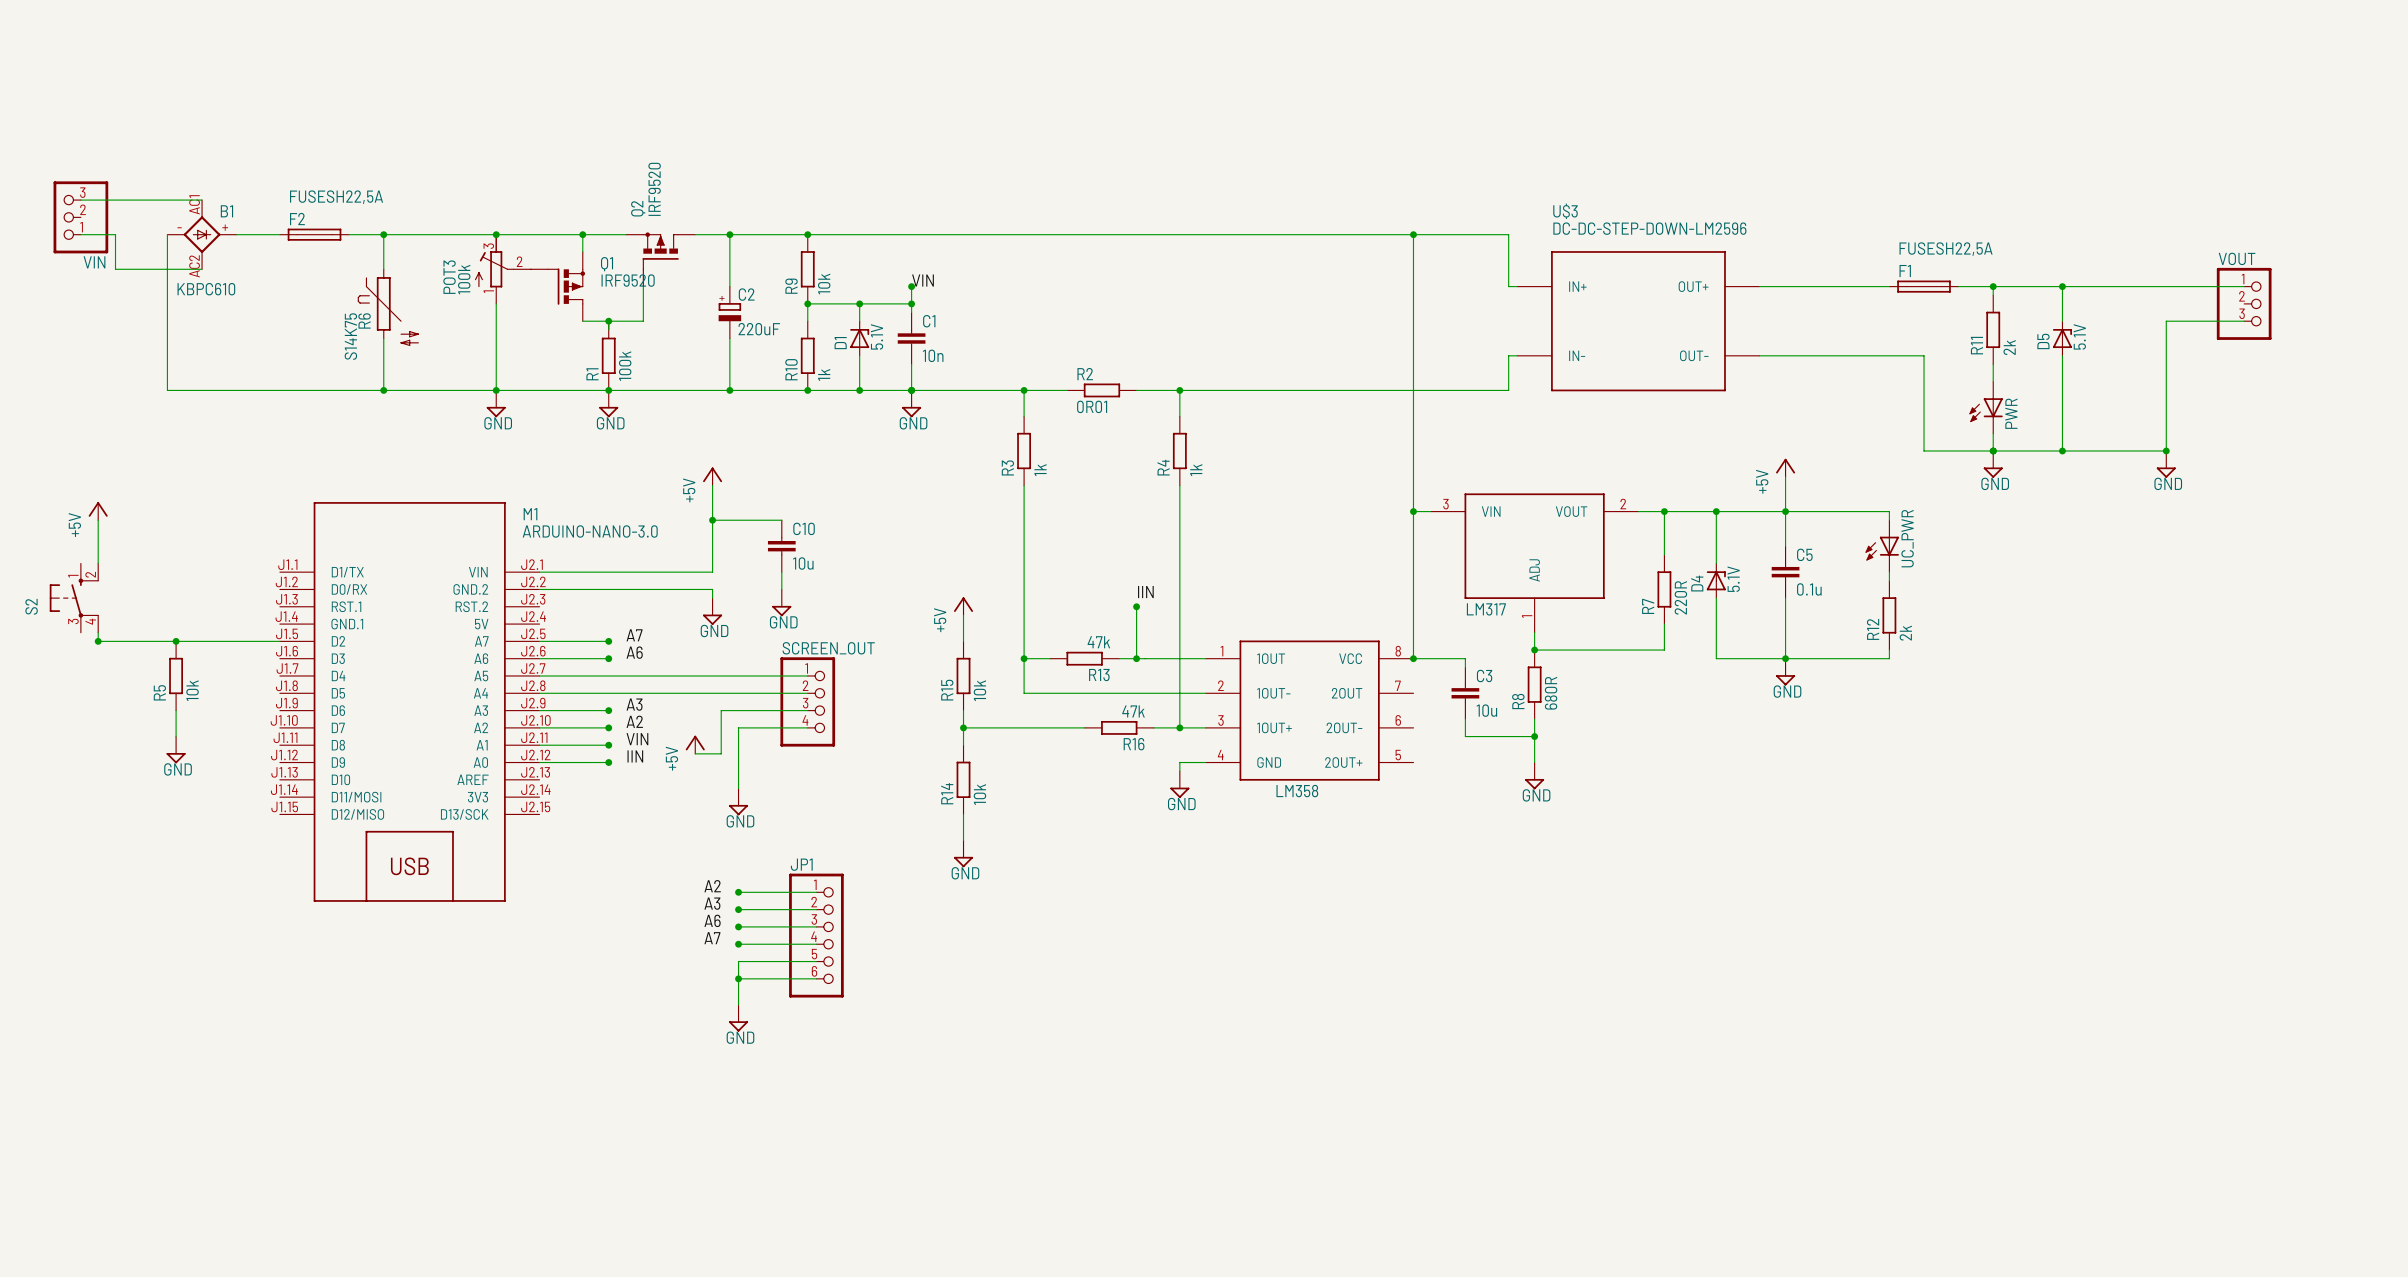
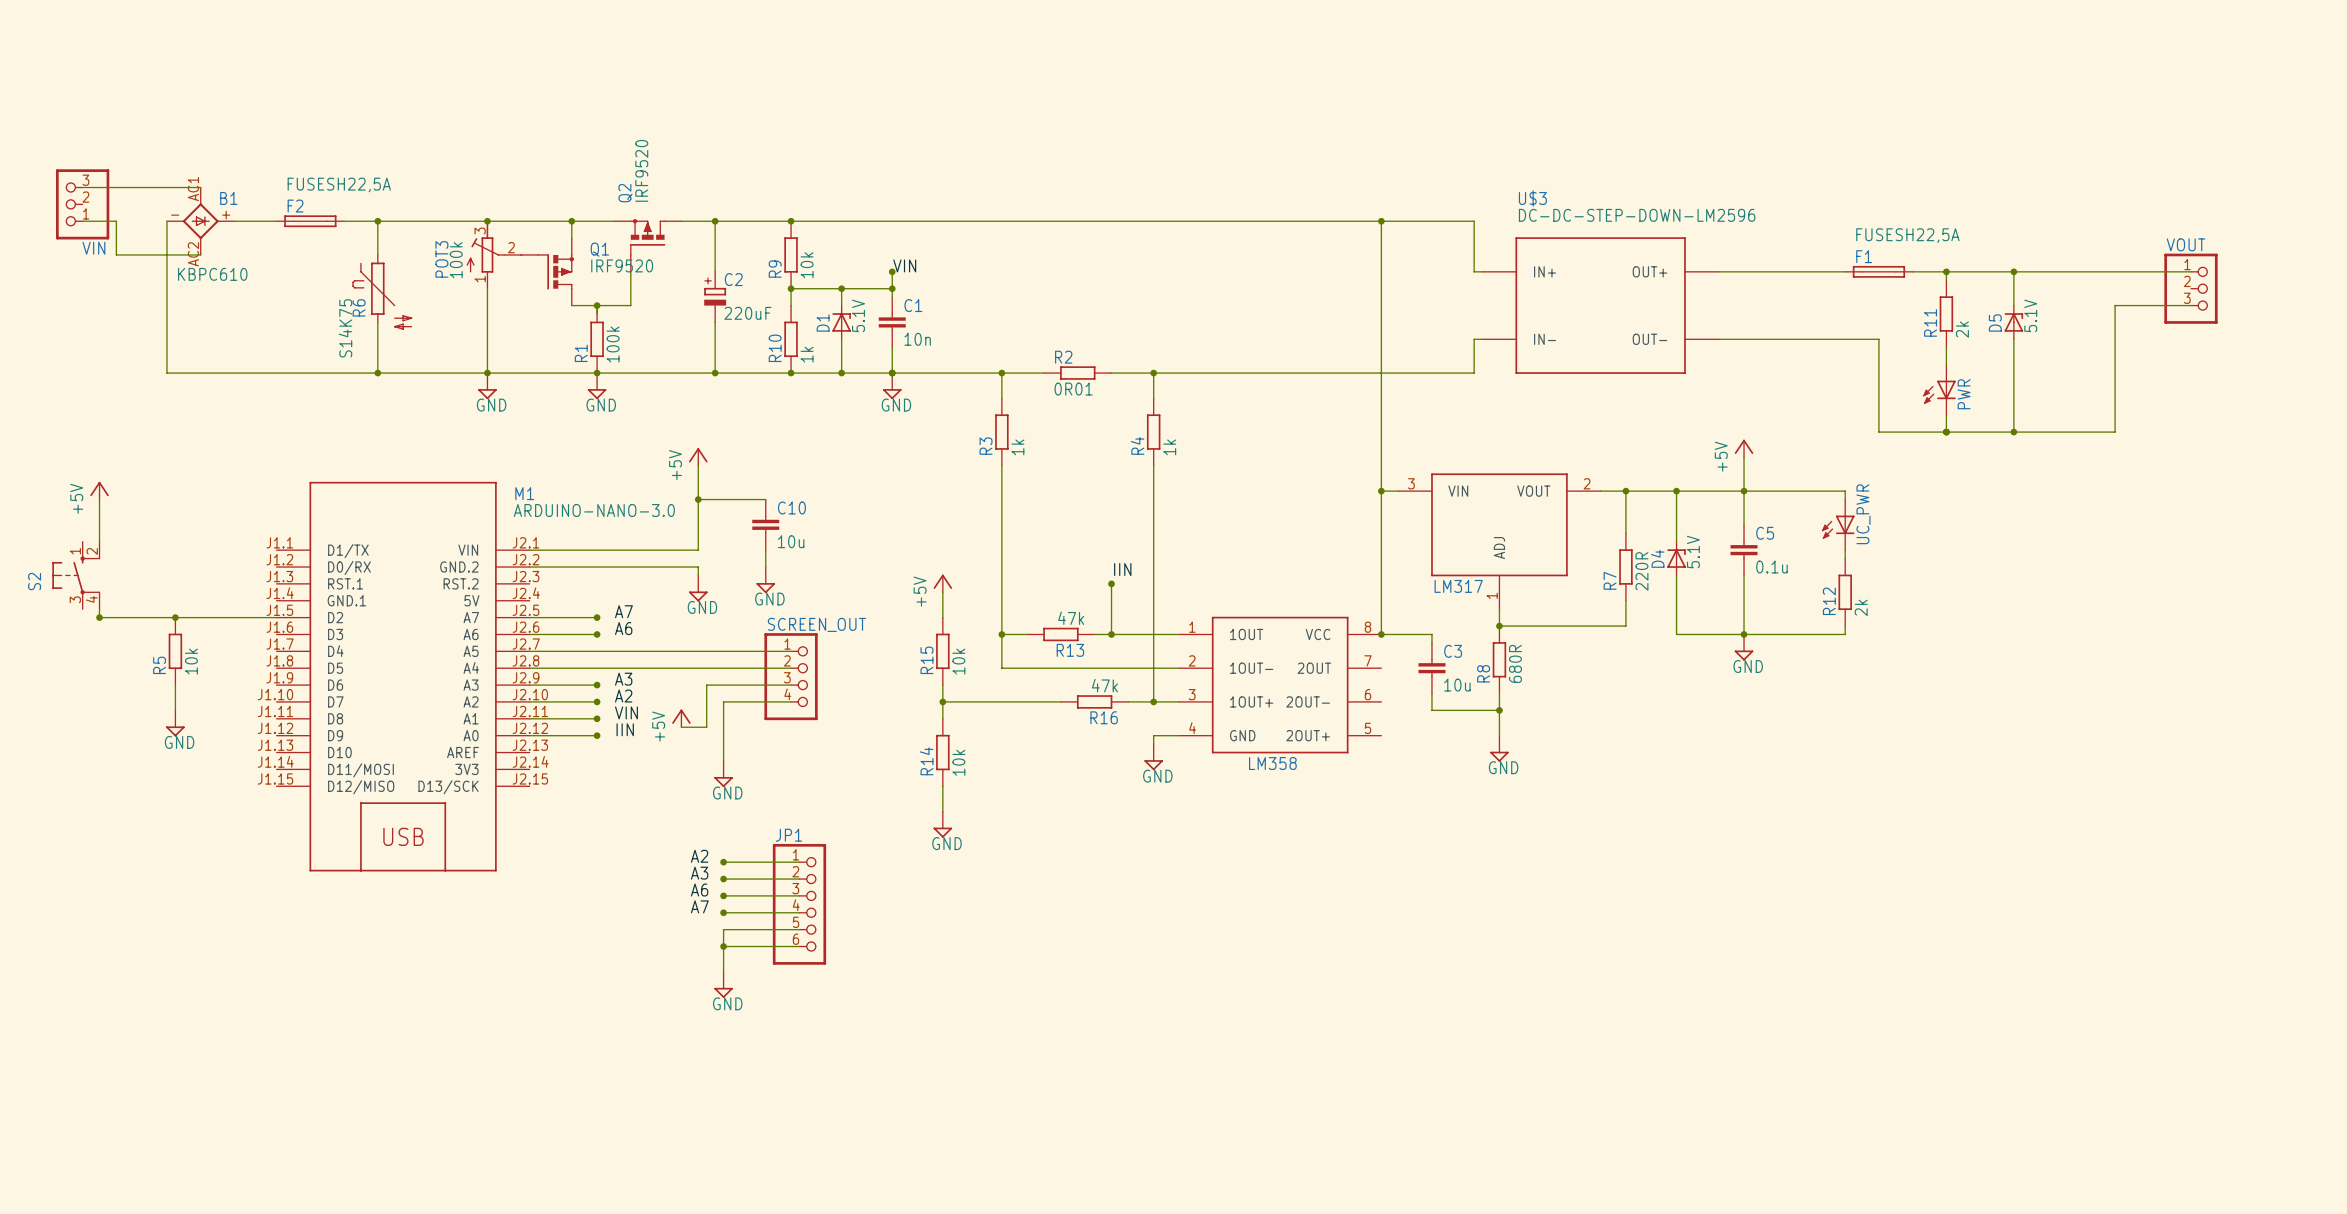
junction: (2166, 451) -> none
power symbol: GND (1993, 464) -> none
power symbol: GND (2166, 464) -> none

